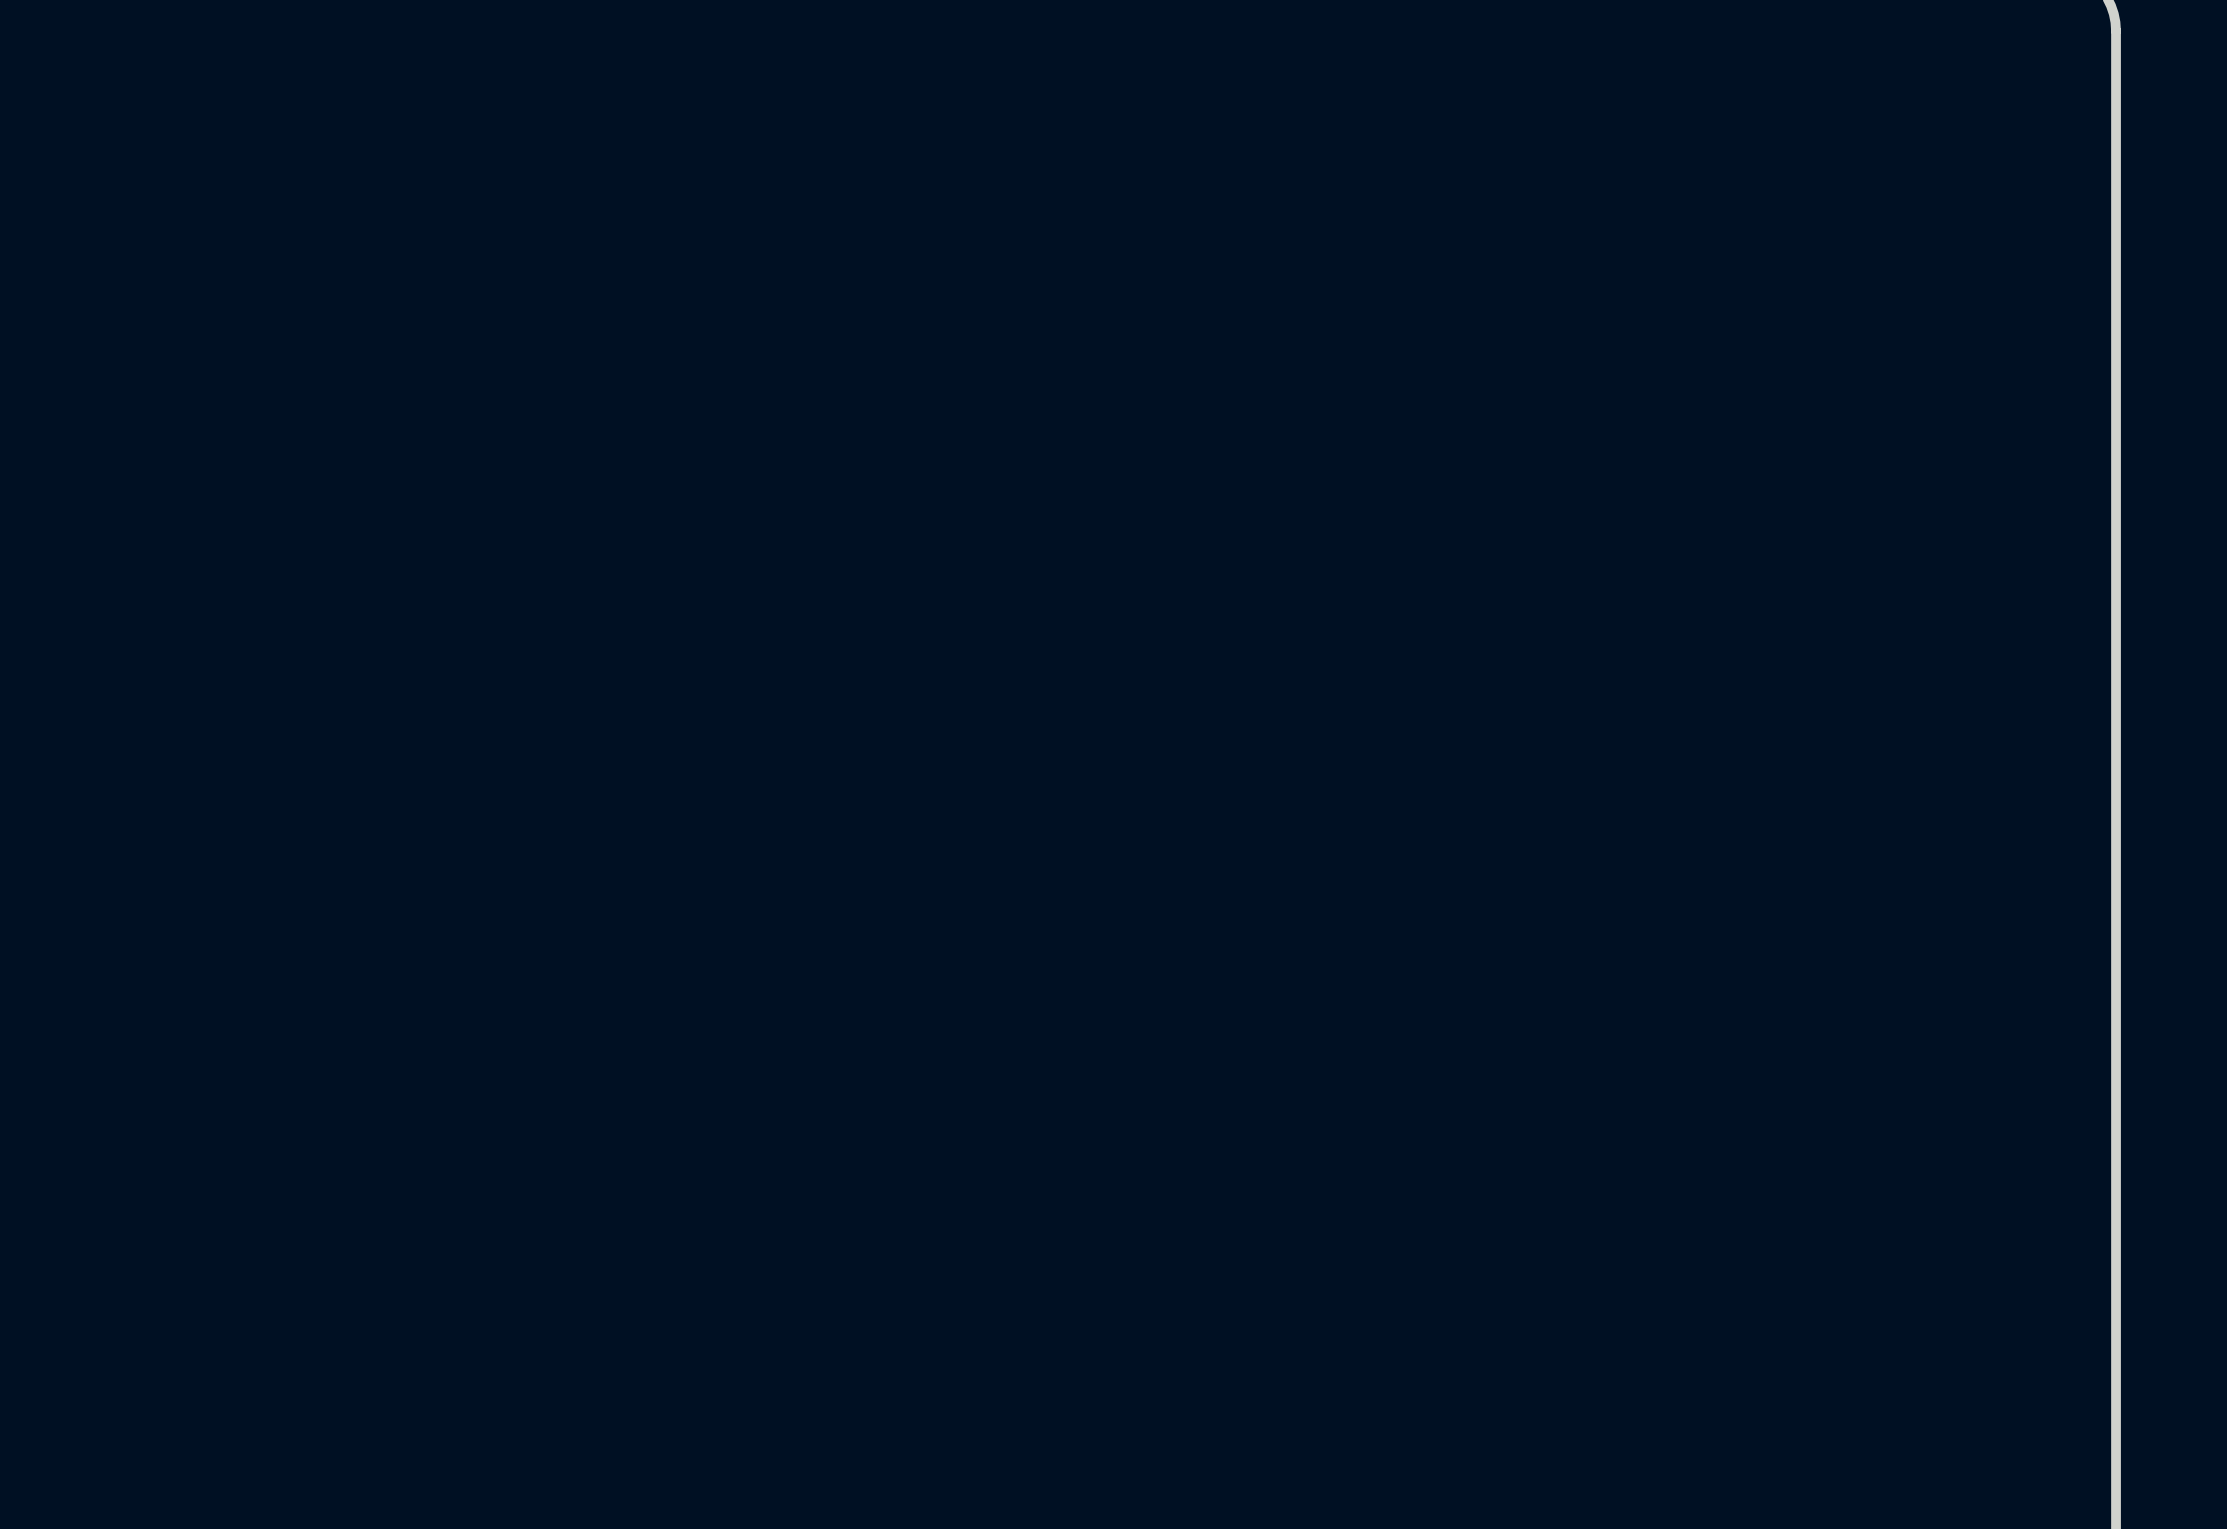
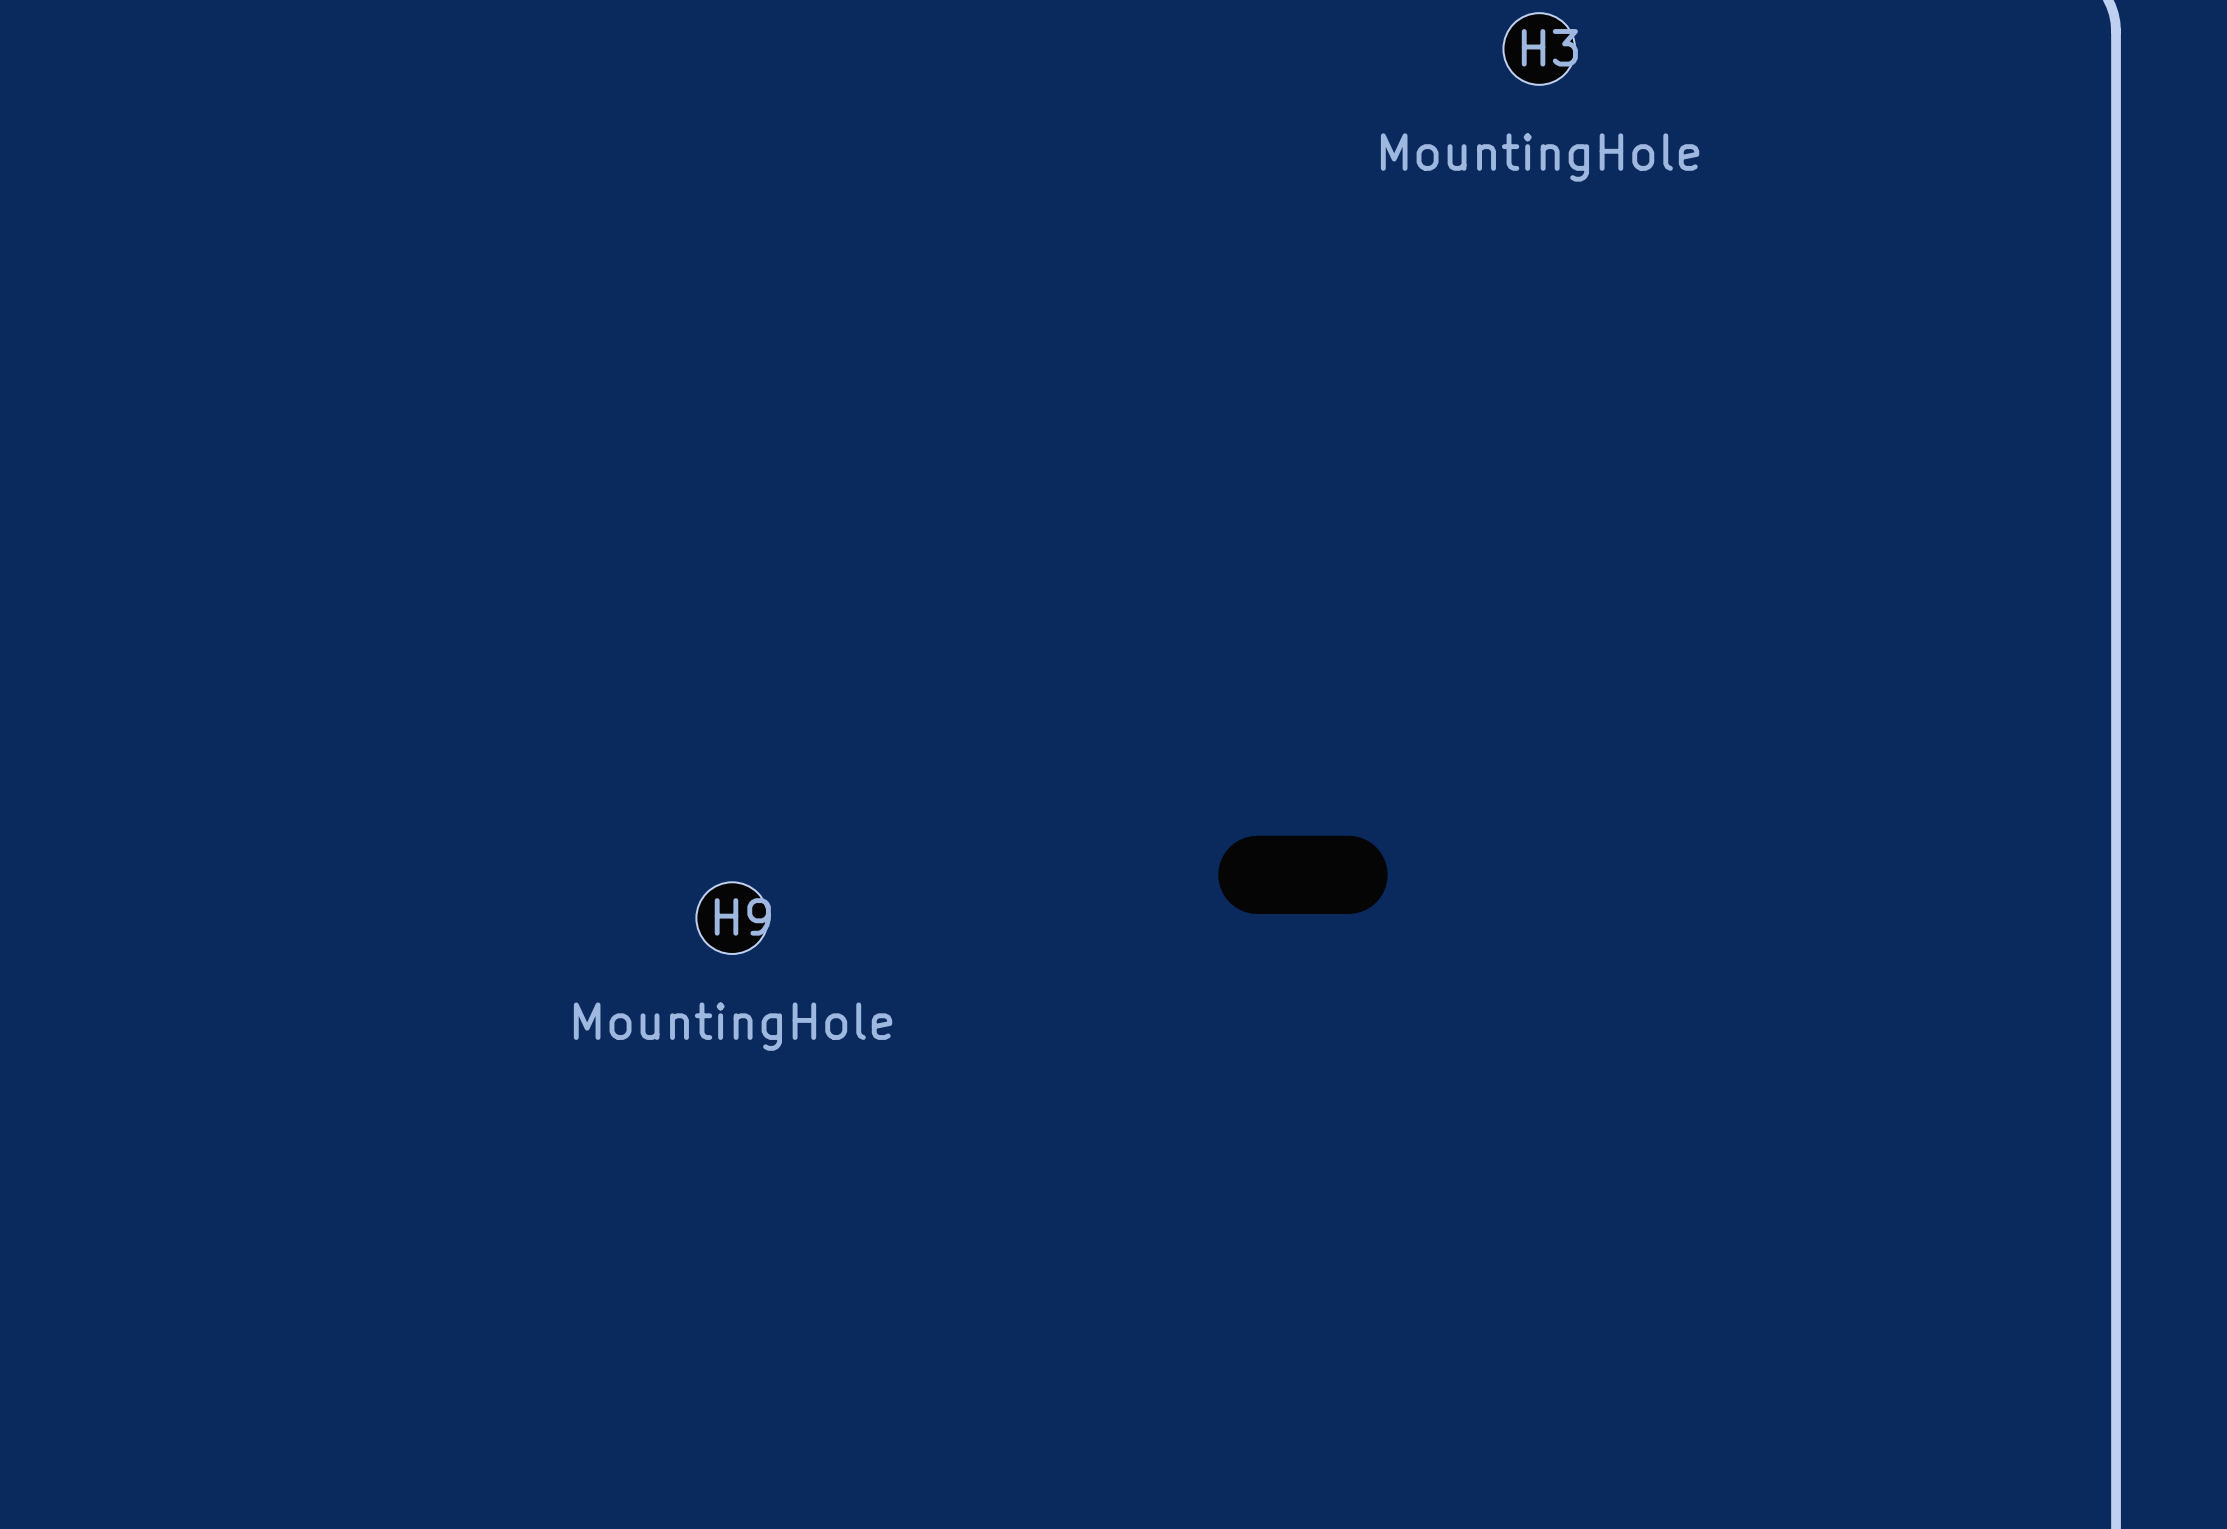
H3: none -> MountingHole (1539, 49)
H9: none -> MountingHole (732, 918)

